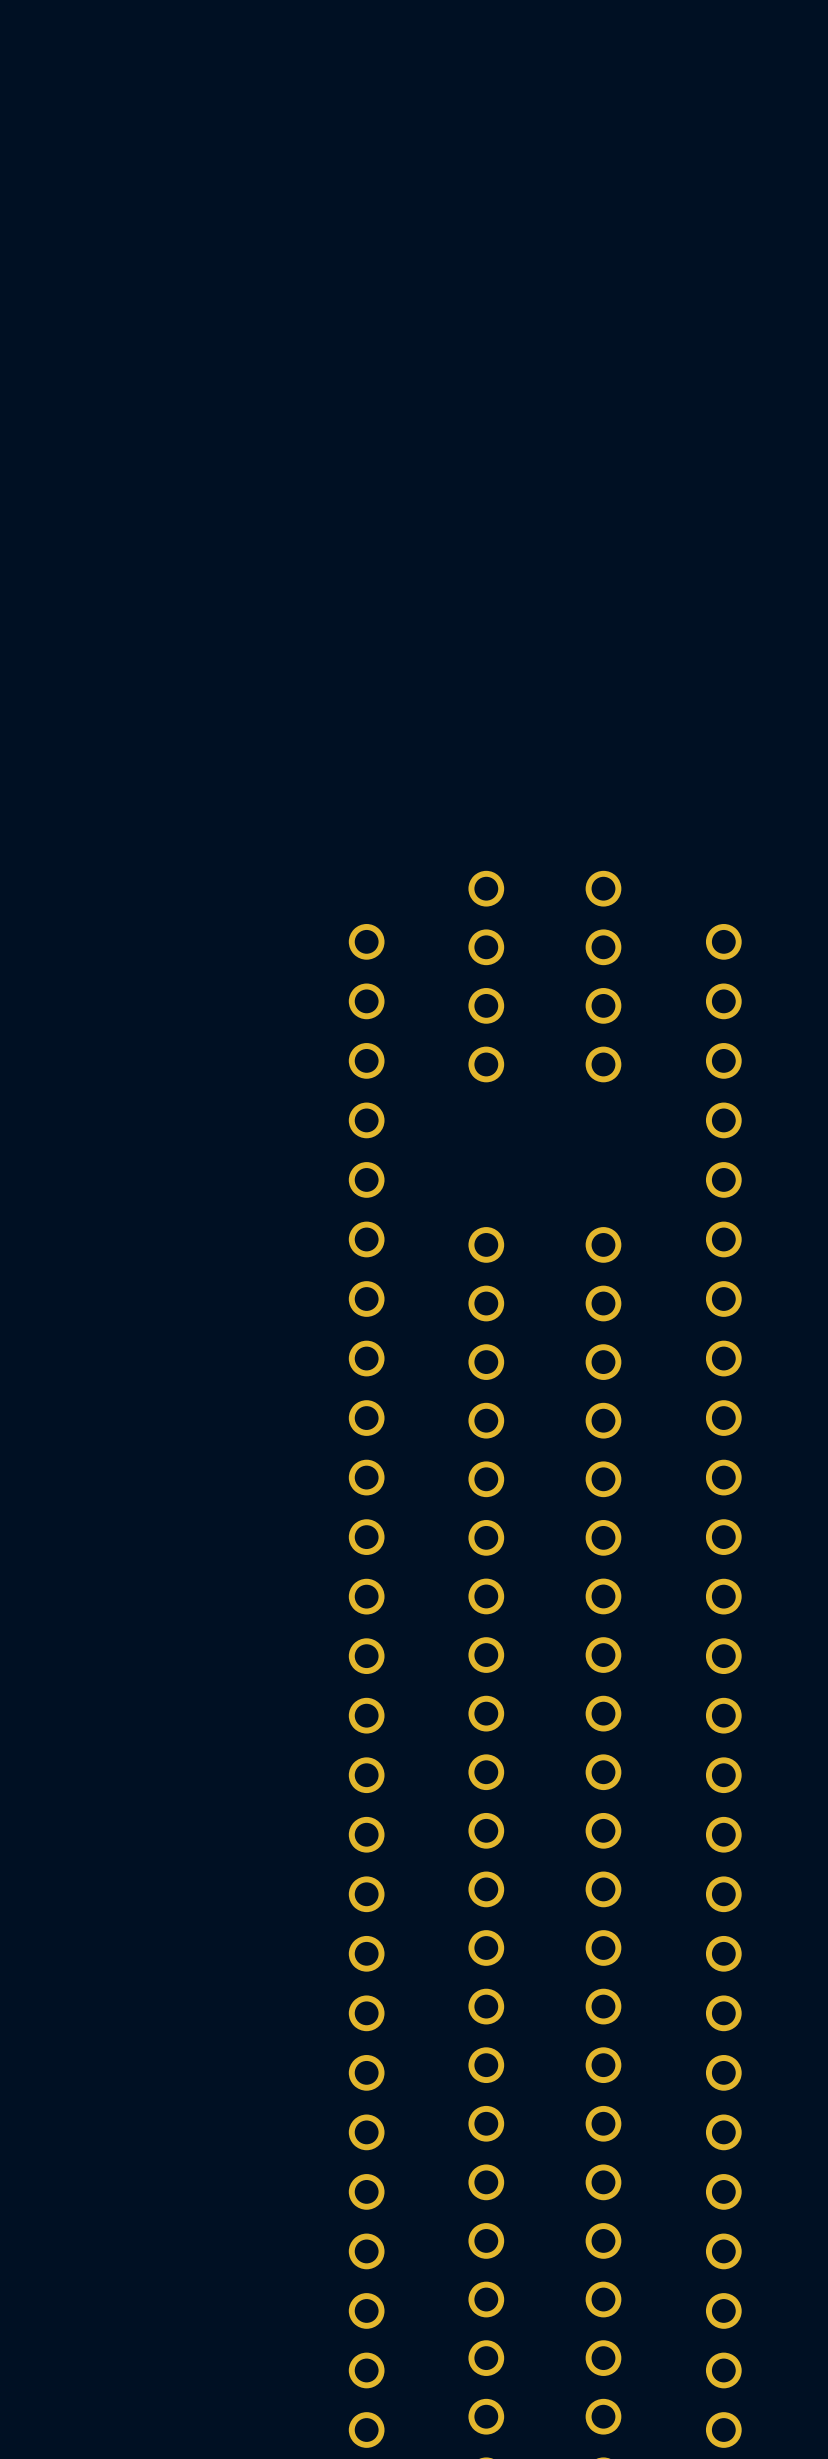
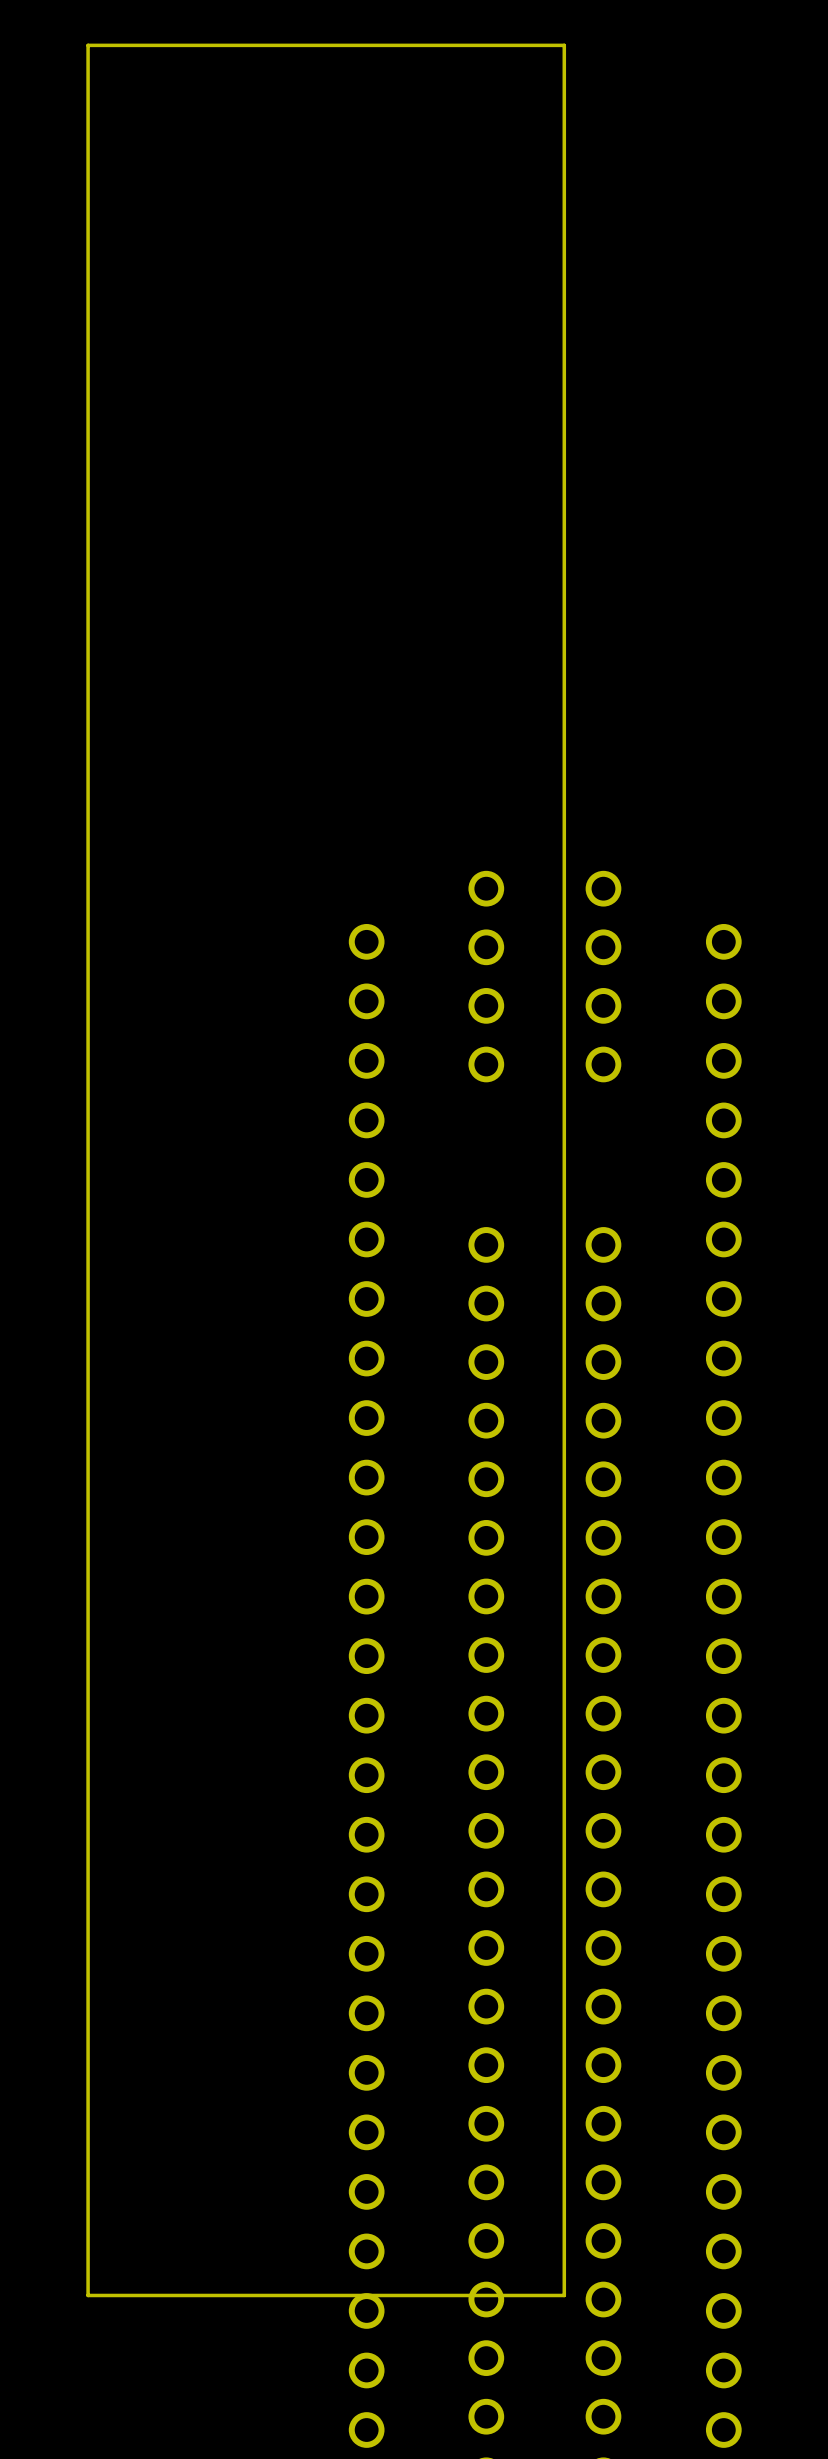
board edge: none -> (564, 45) (88, 45) (88, 2295) (564, 2295) (564, 45)

